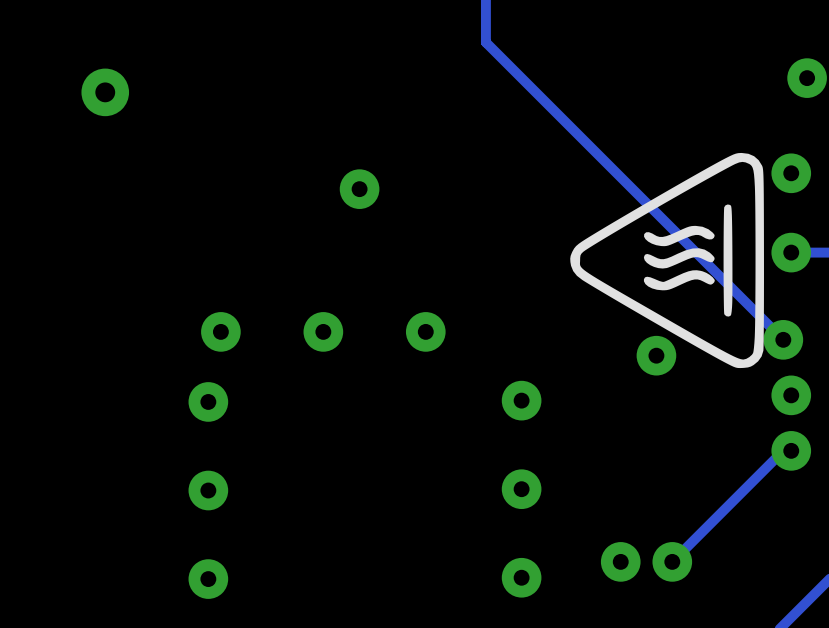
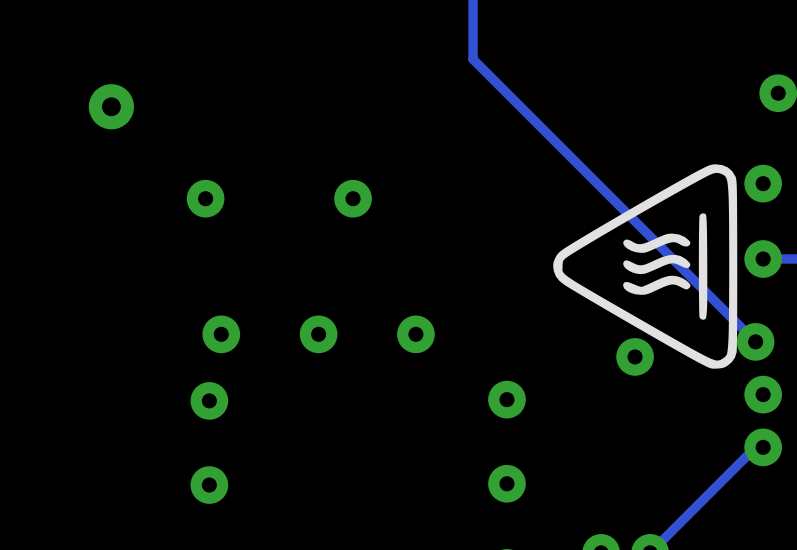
via: none -> (205, 198)

